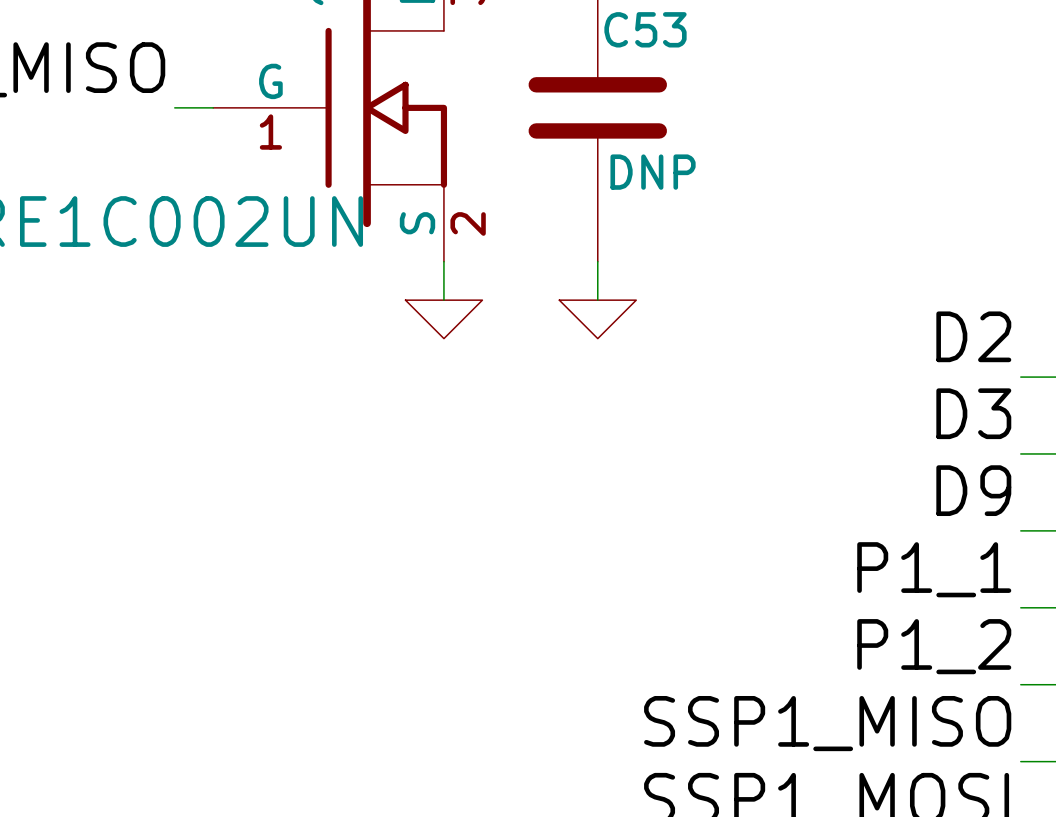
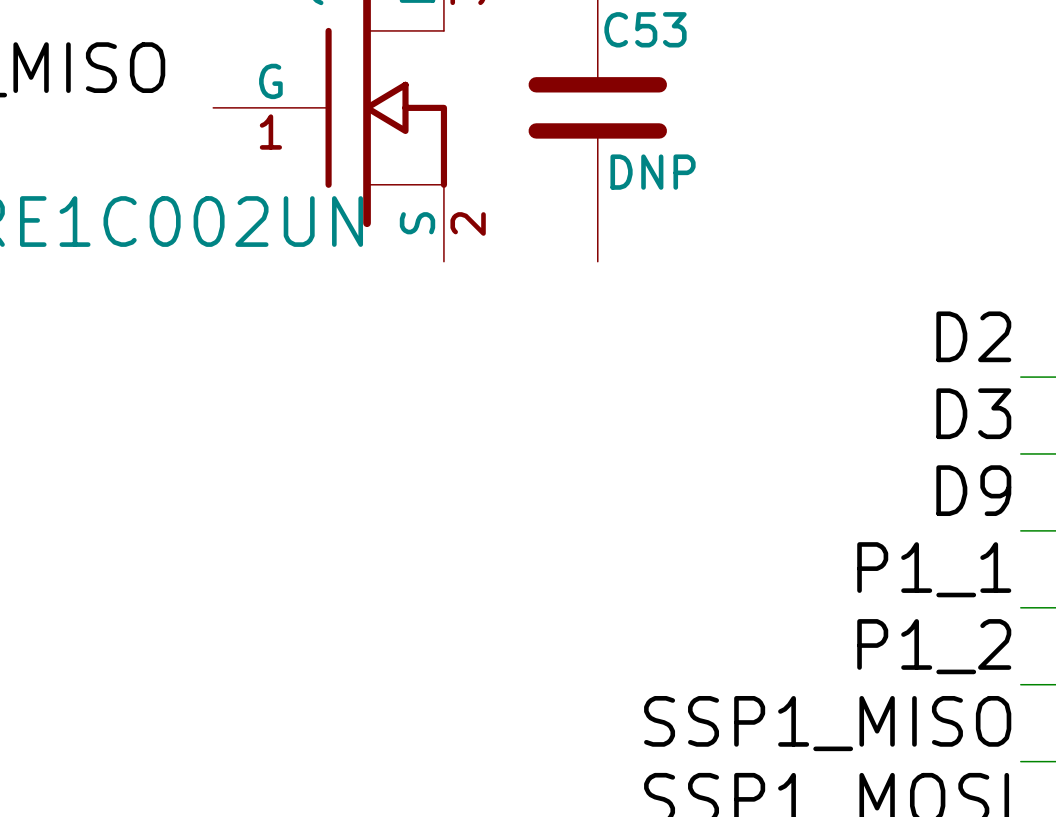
wire: (174, 107) (213, 107) -> none
wire: (443, 261) (443, 300) -> none
wire: (597, 261) (597, 300) -> none
power symbol: (443, 319) -> none
power symbol: (597, 319) -> none

